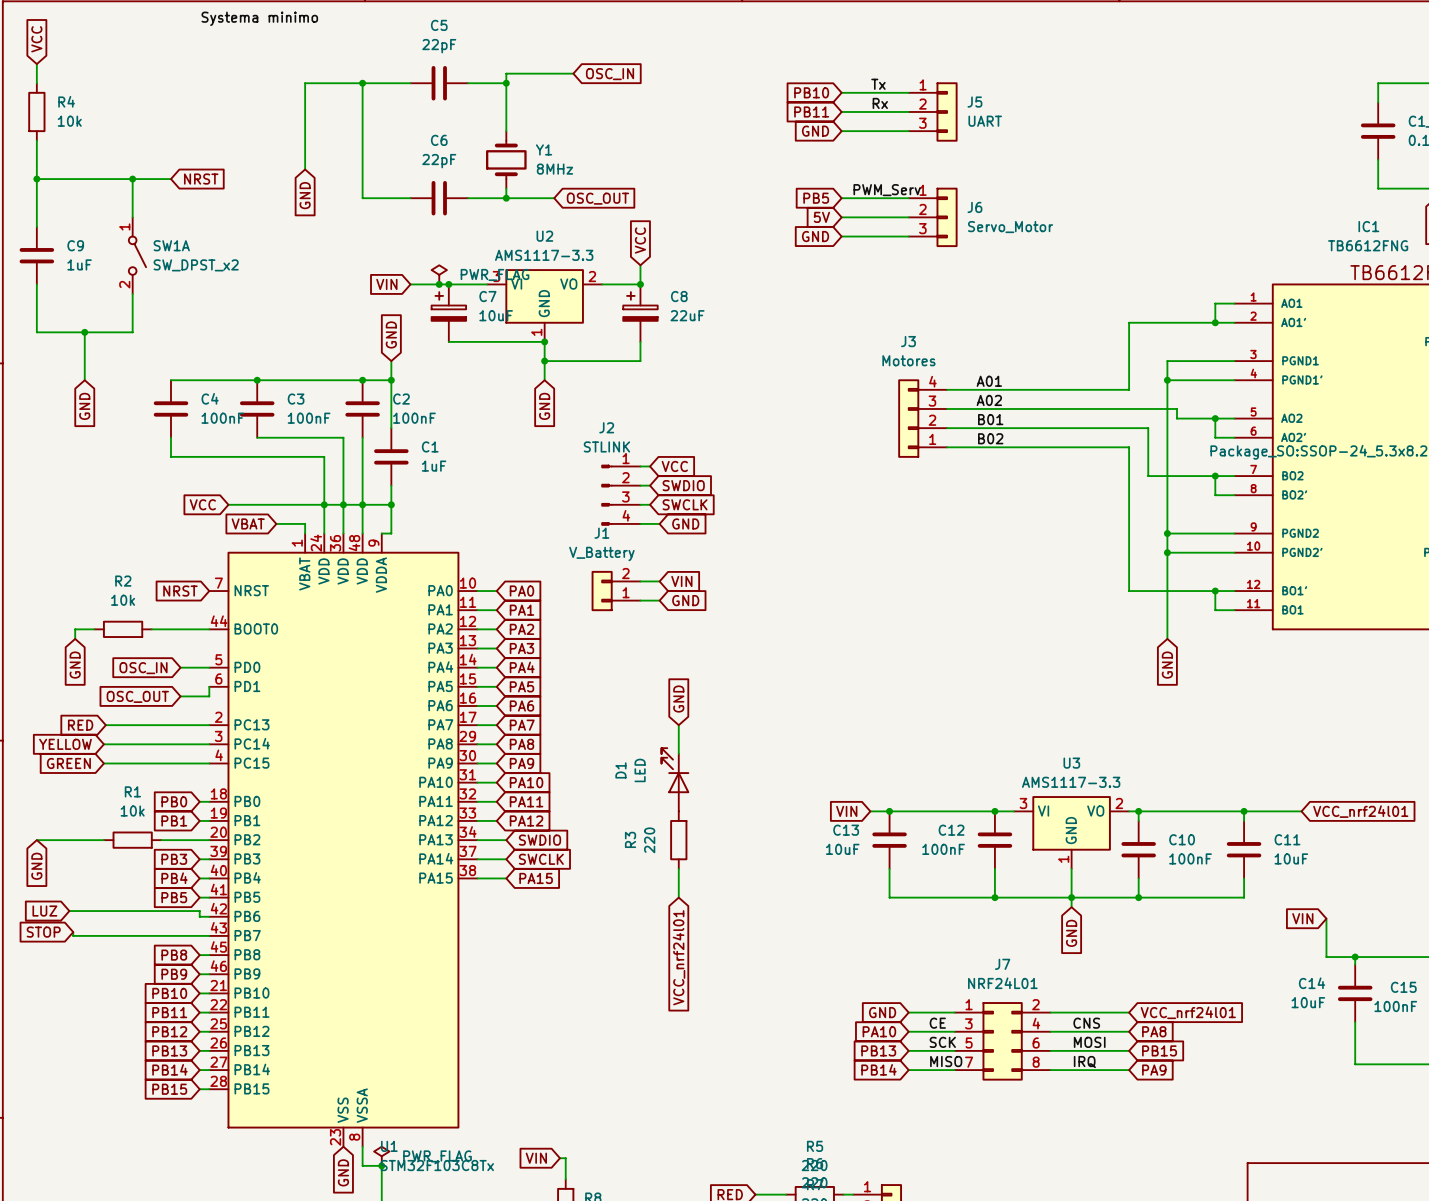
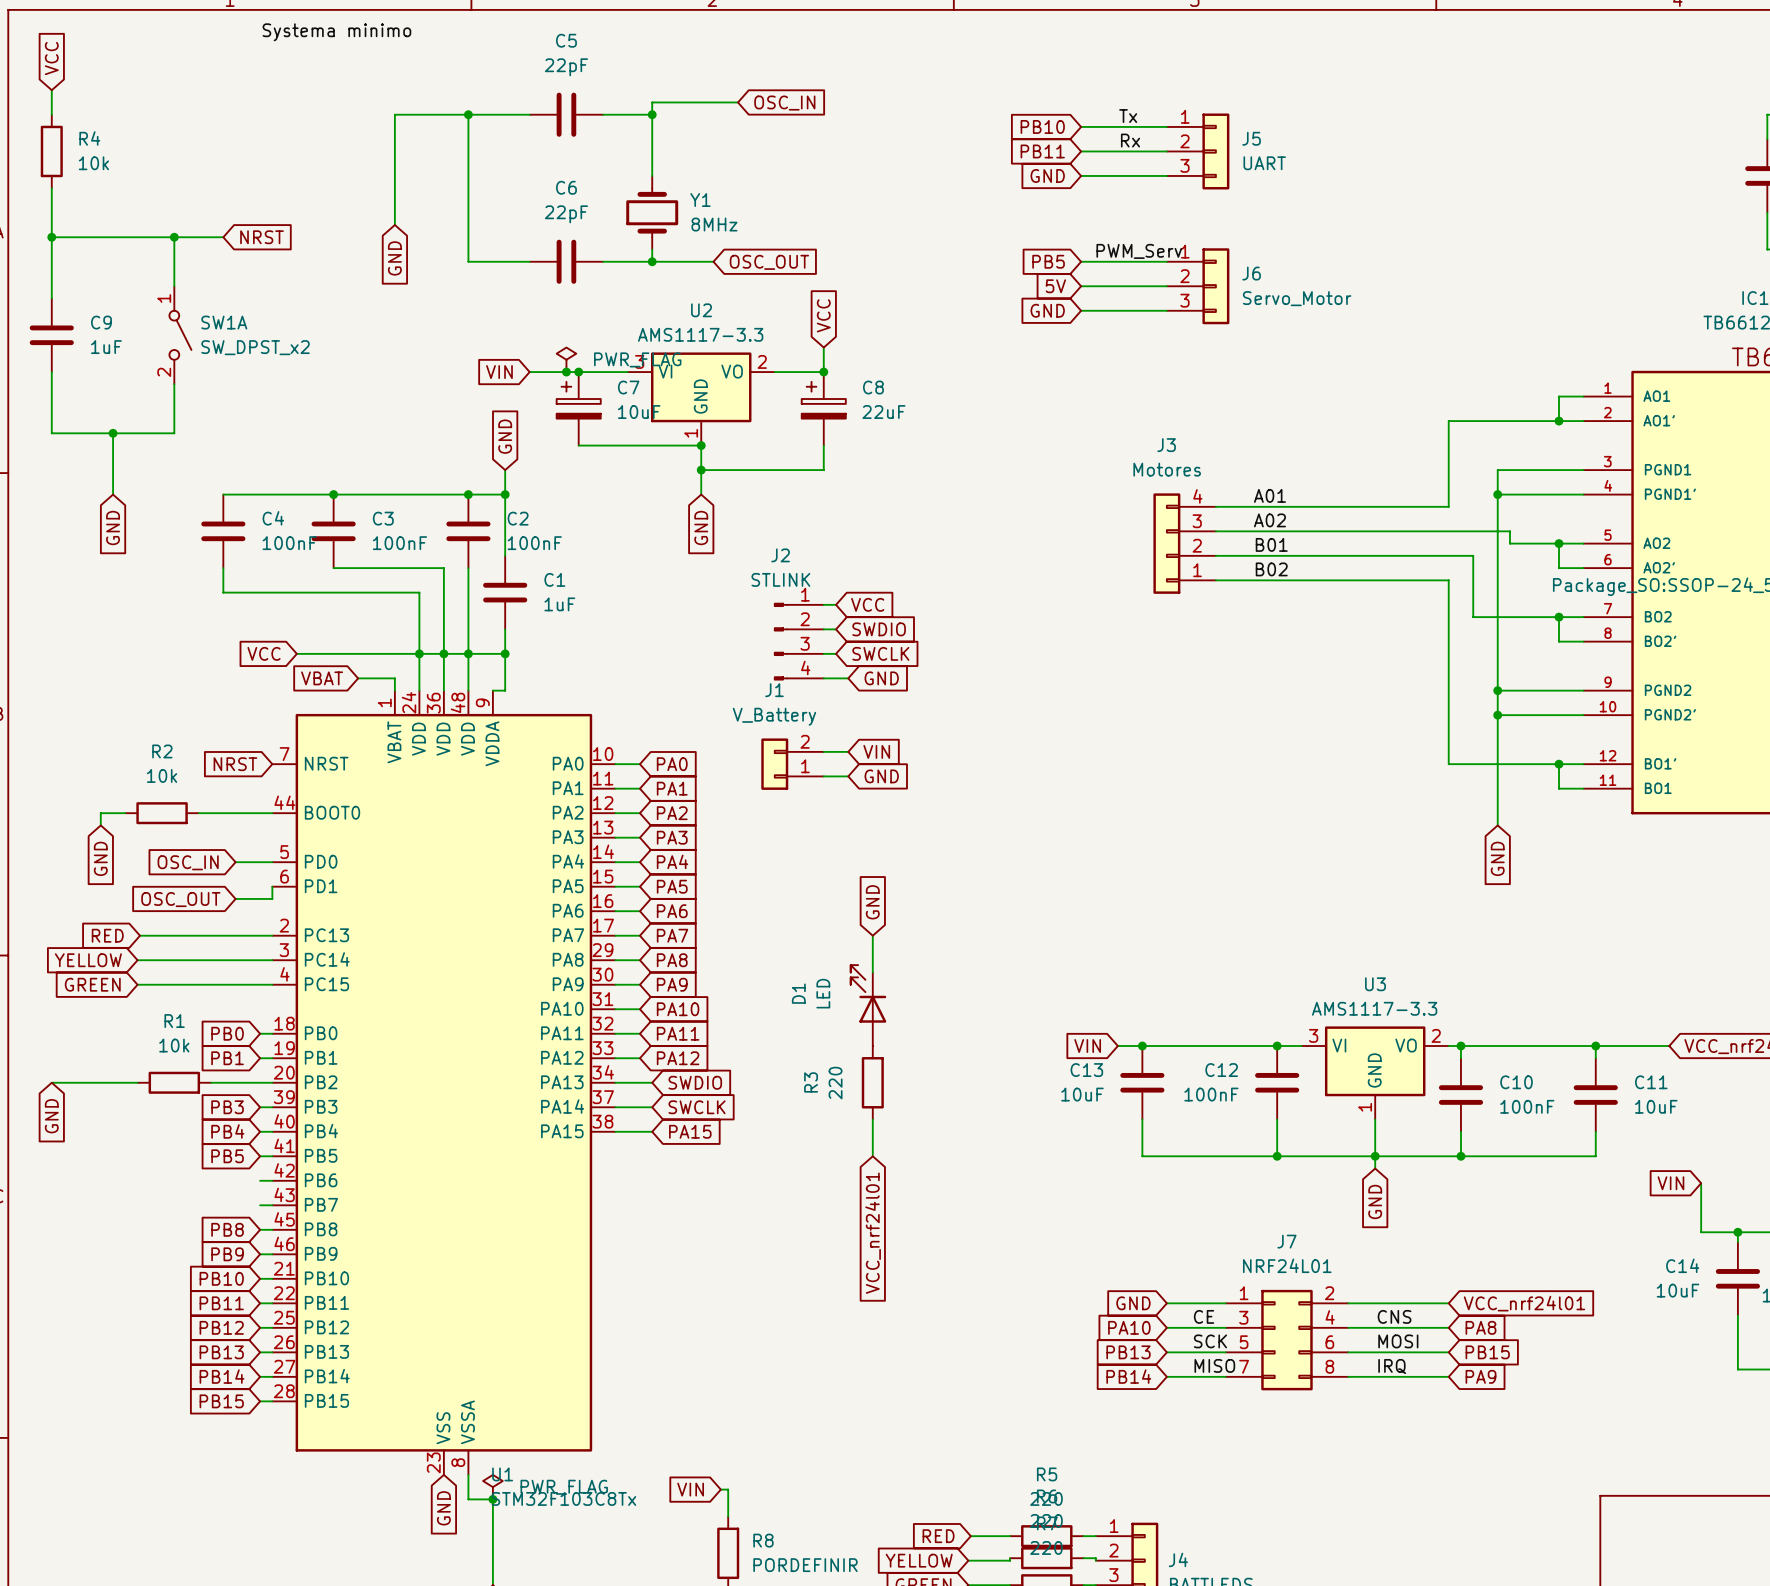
global label: LUZ (44, 911) -> none
wire: (69, 911) (199, 911) (199, 916) -> none
global label: STOP (43, 932) -> none
wire: (73, 932) (73, 935) (199, 935) -> none

